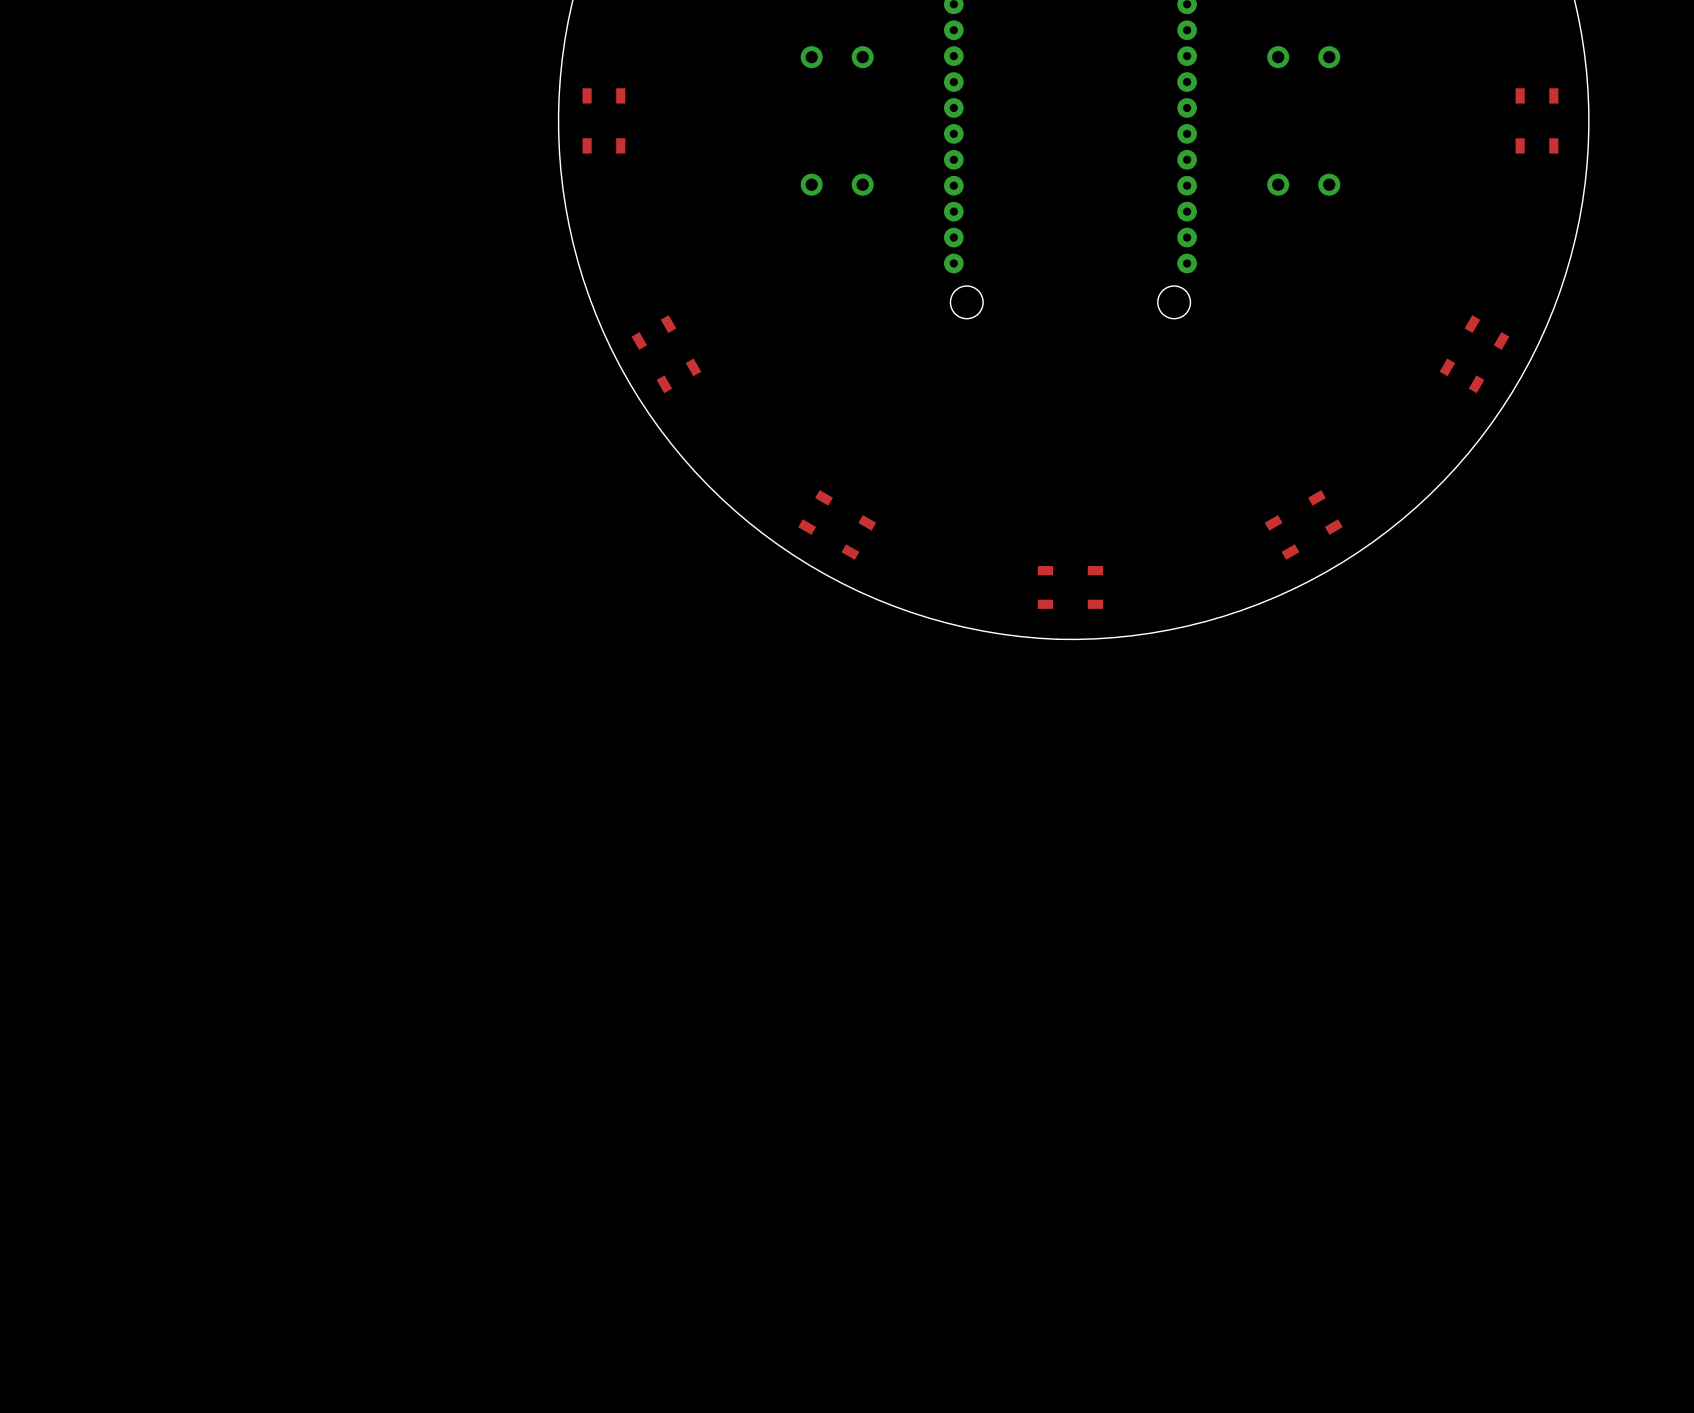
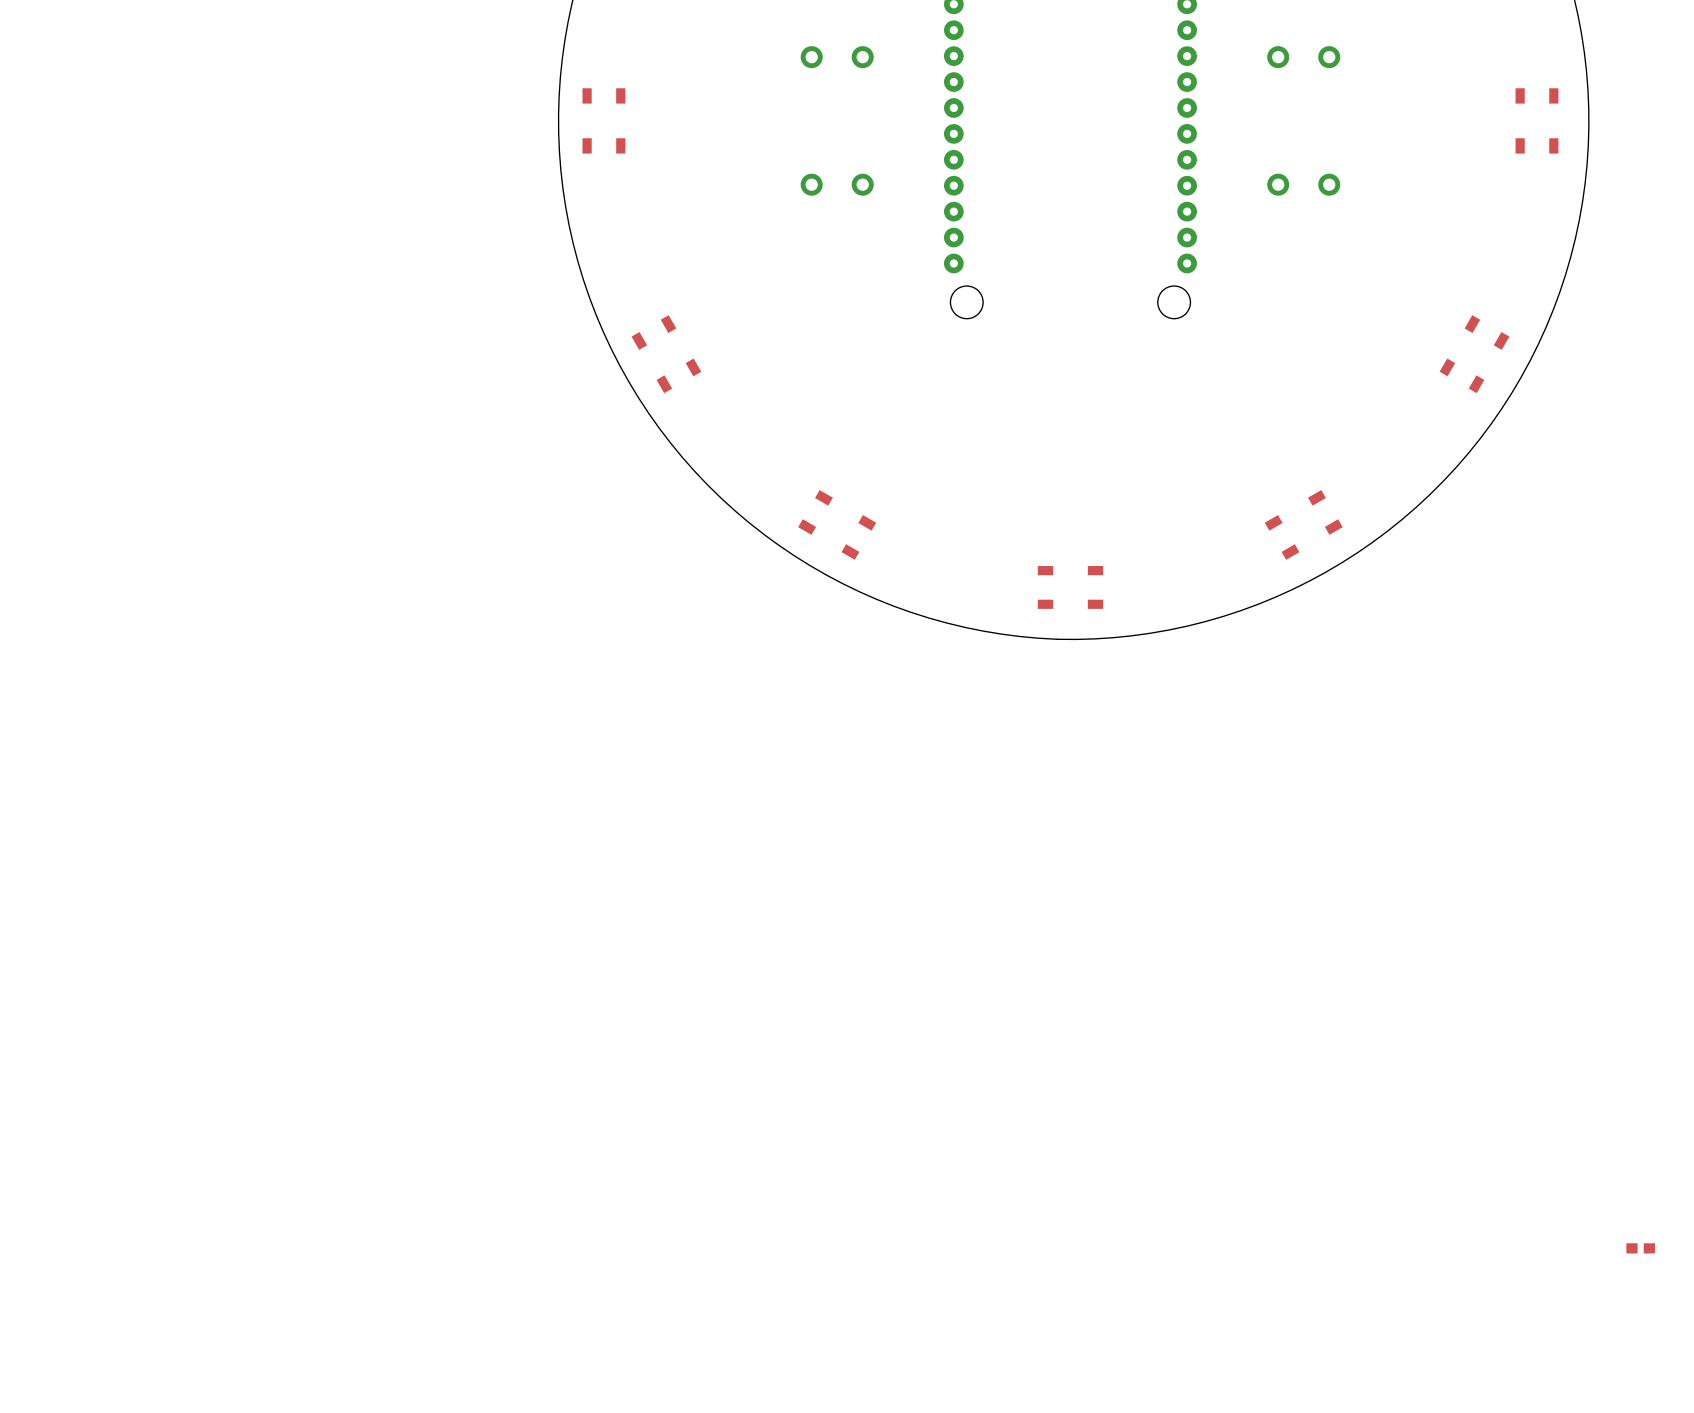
part: none -> (1640, 1248)

